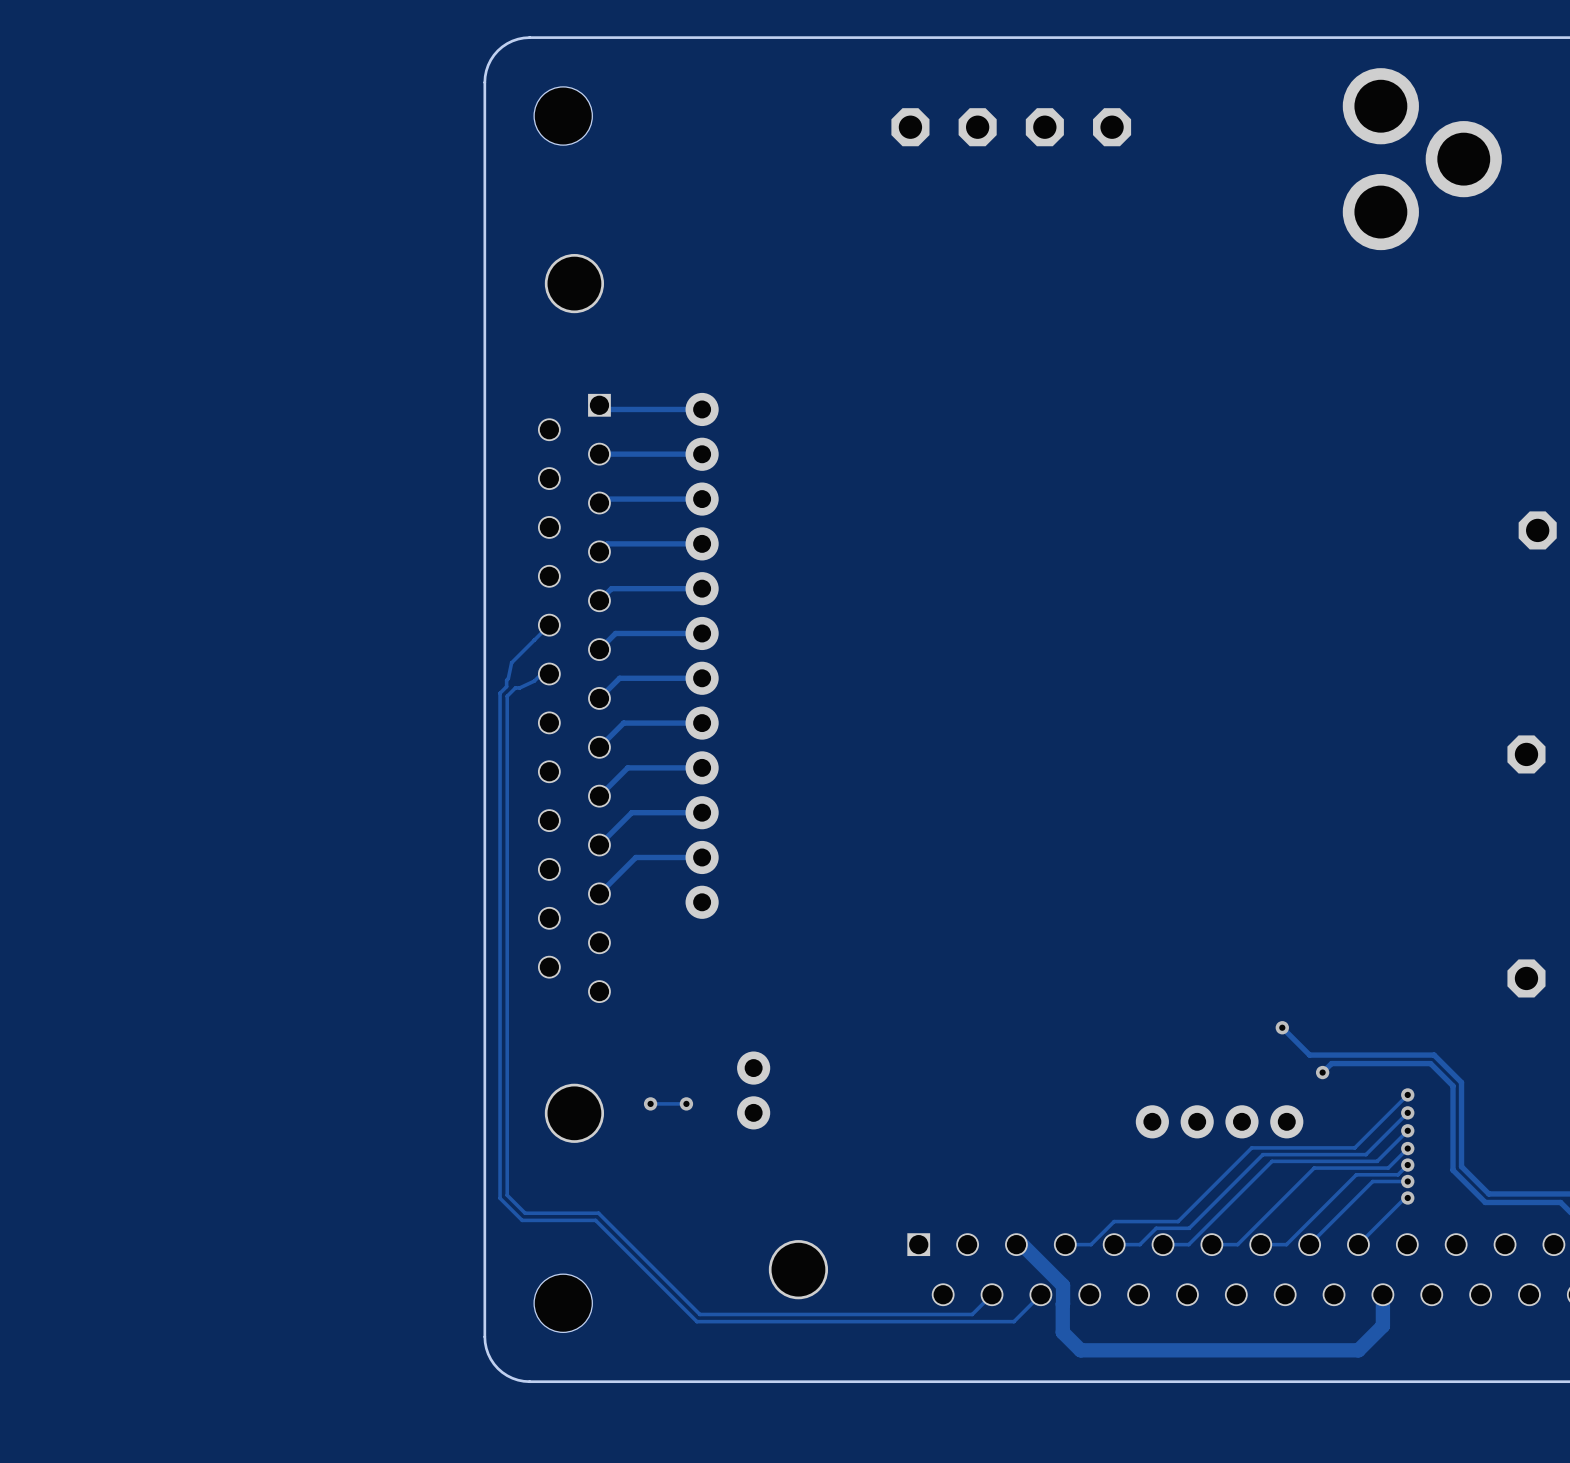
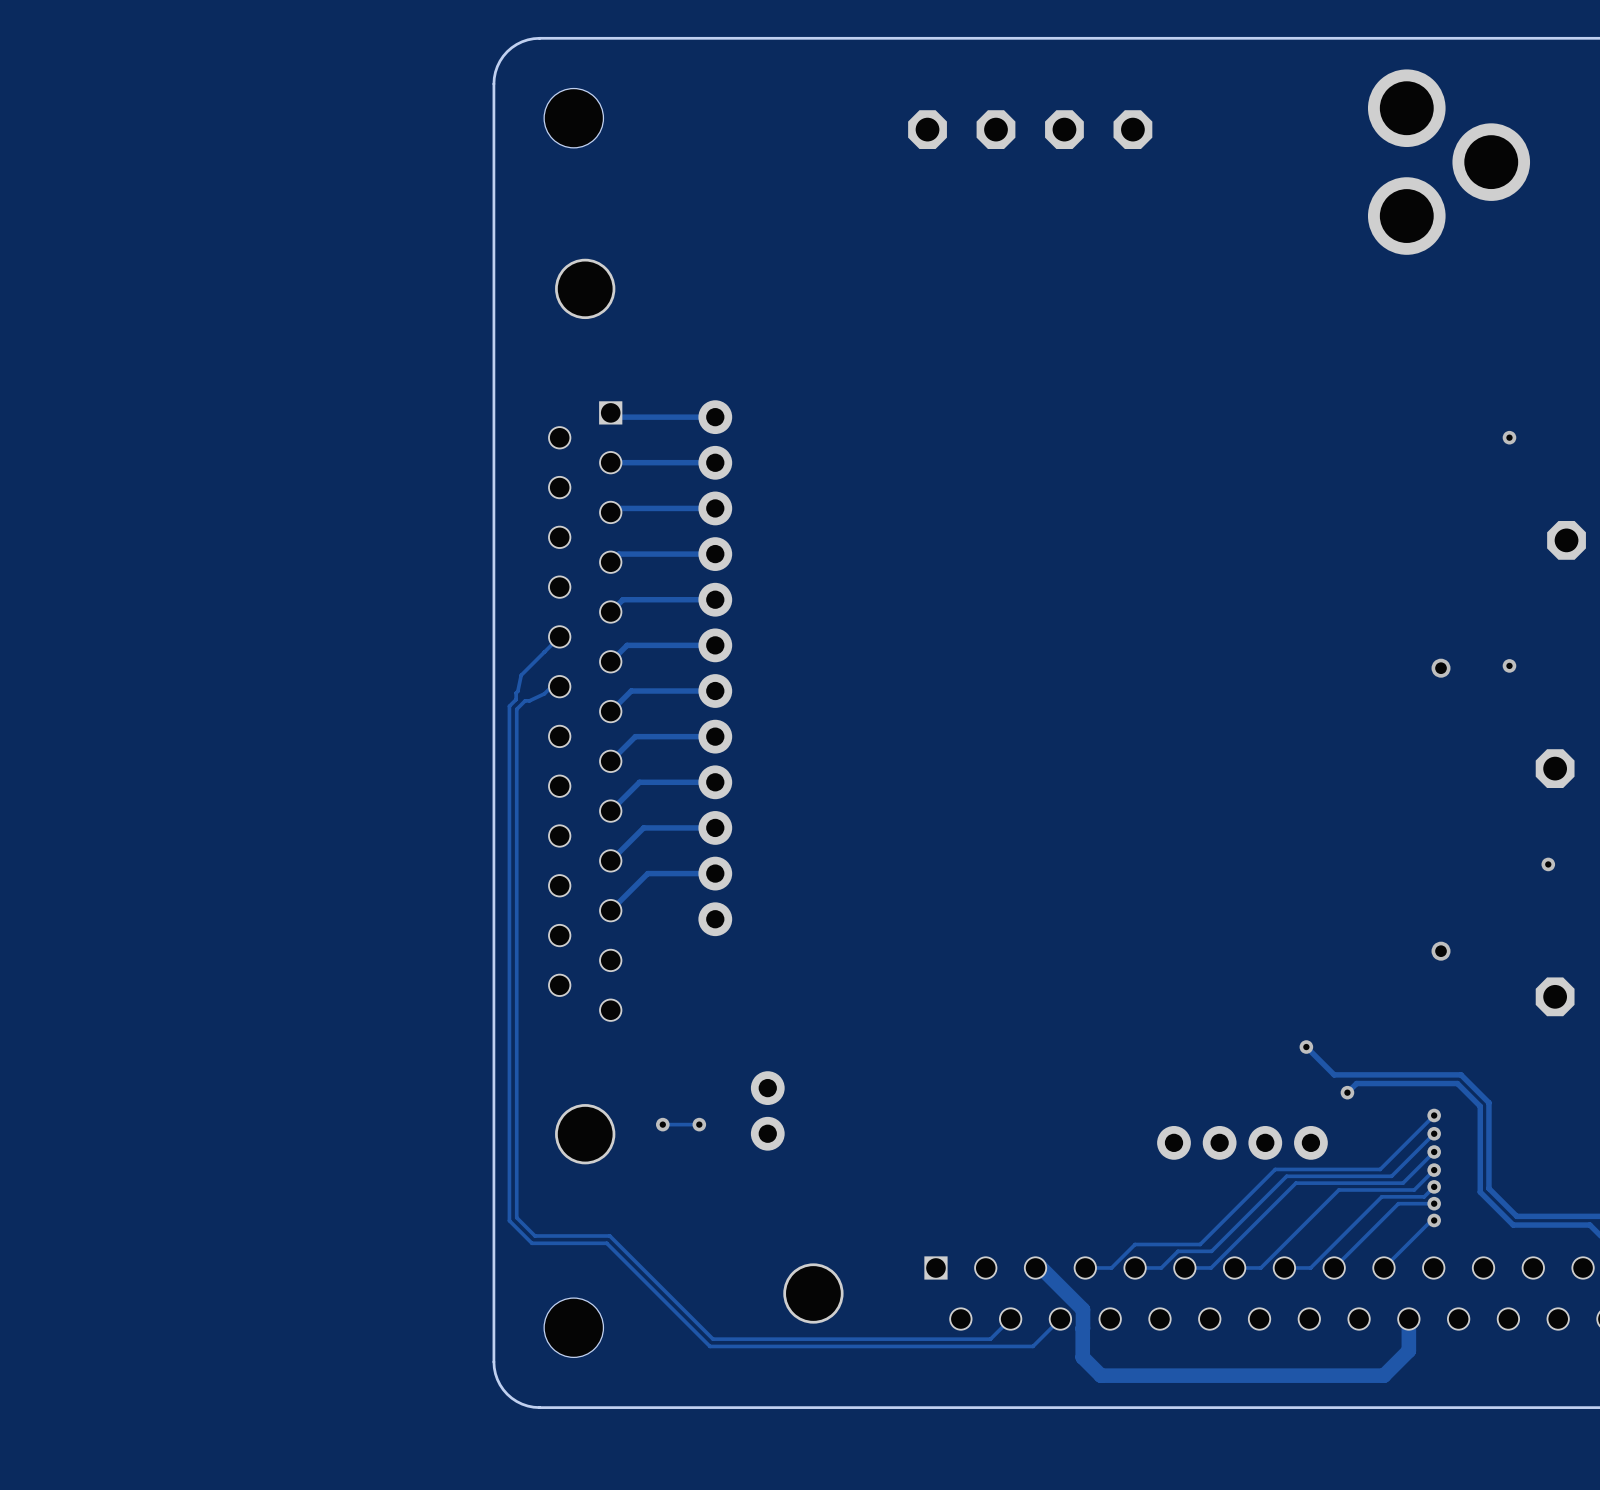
via: none -> (1509, 437)
via: none -> (1509, 665)
via: none -> (1441, 668)
via: none -> (1548, 864)
via: none -> (1441, 951)

